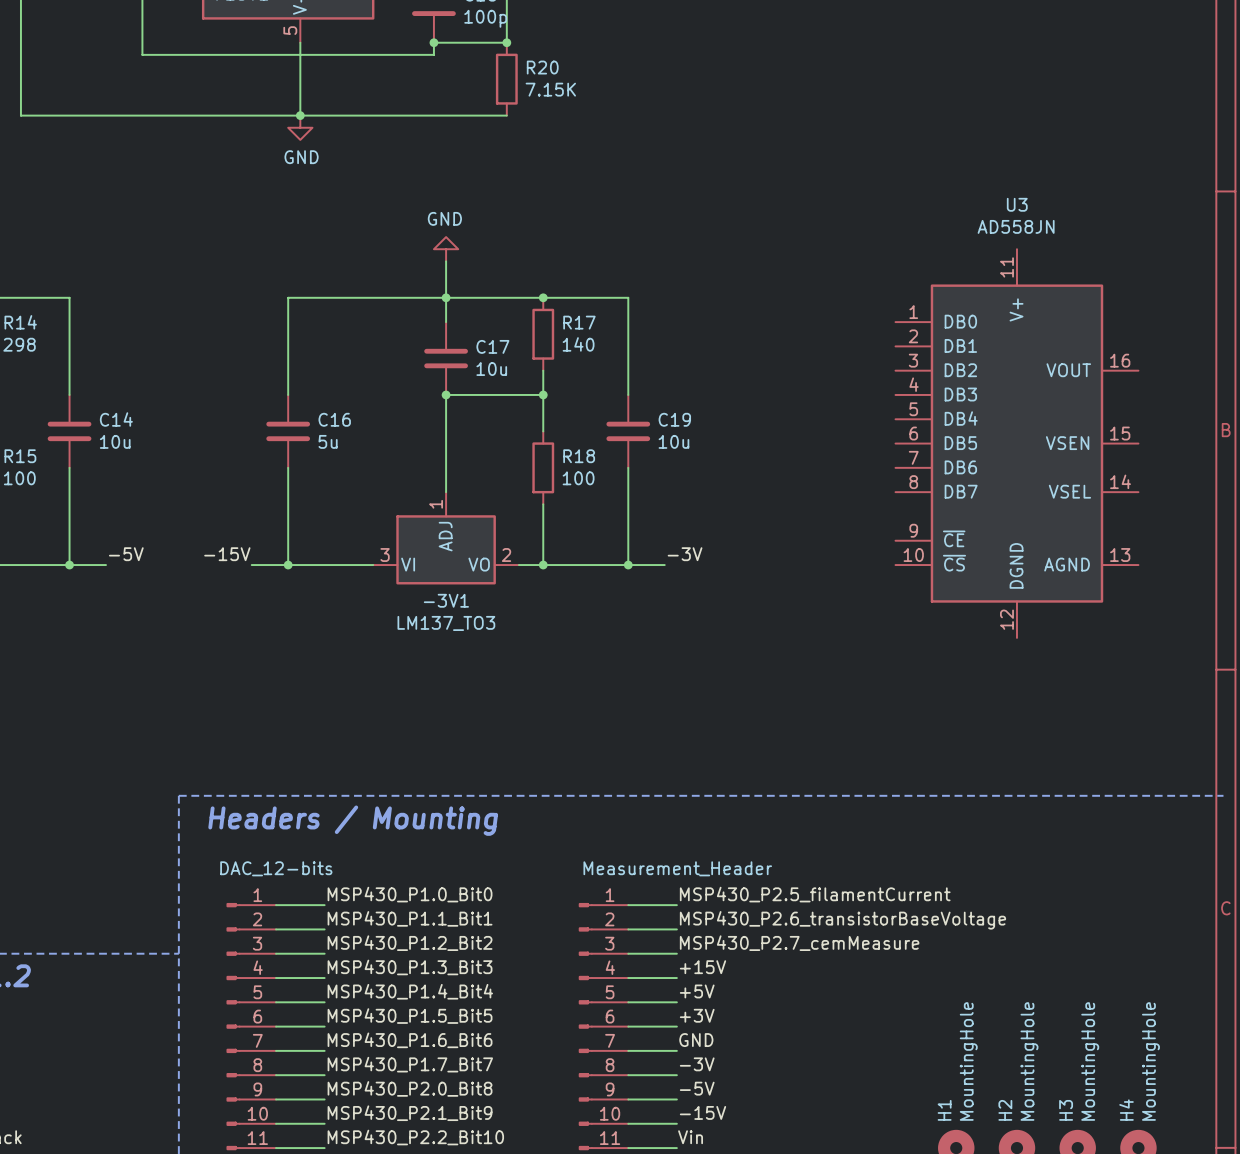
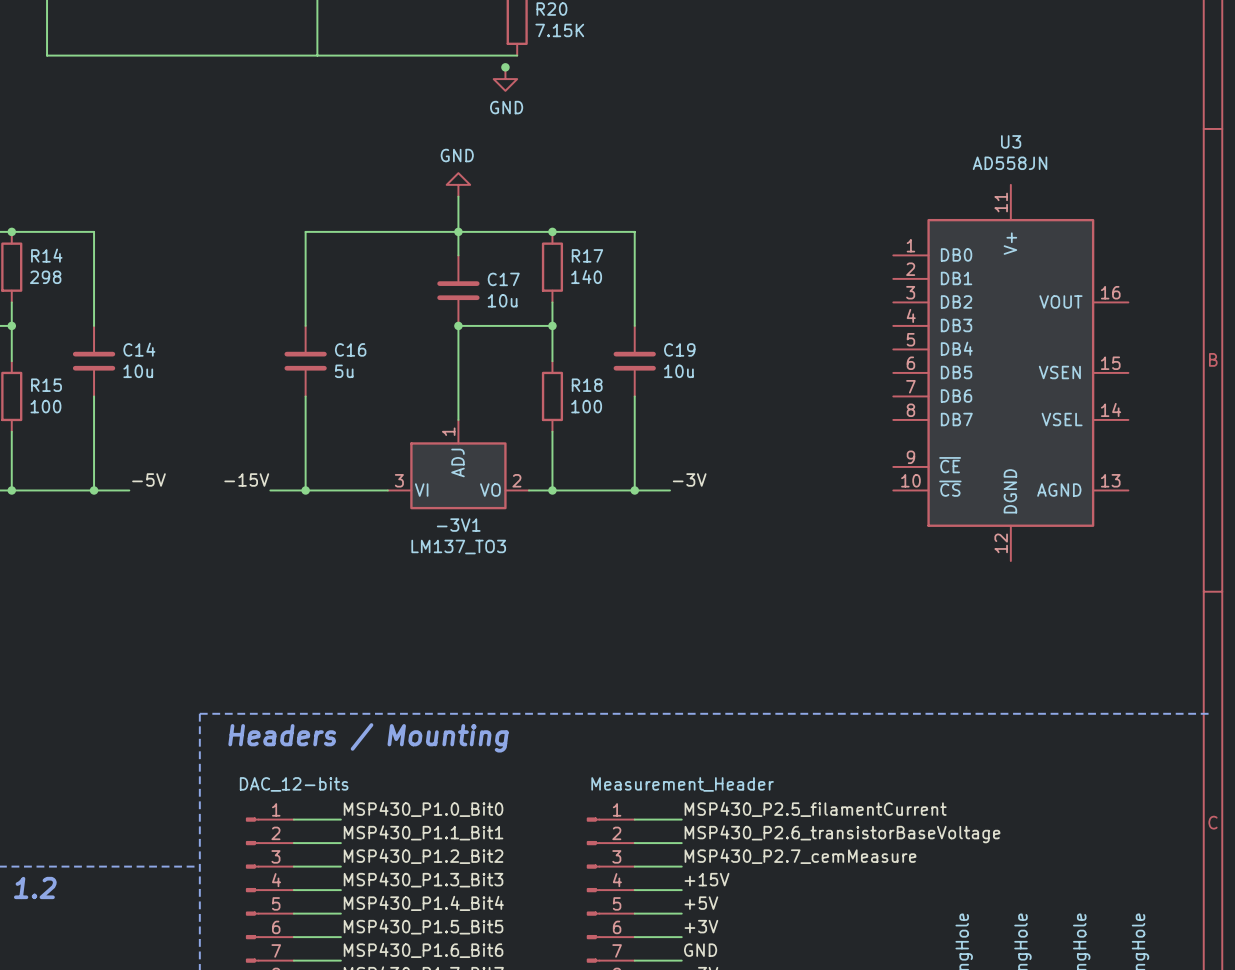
junction: (300, 115) -> none
power symbol position: GND (300, 127) -> GND (505, 79)
junction: none -> (505, 67)

